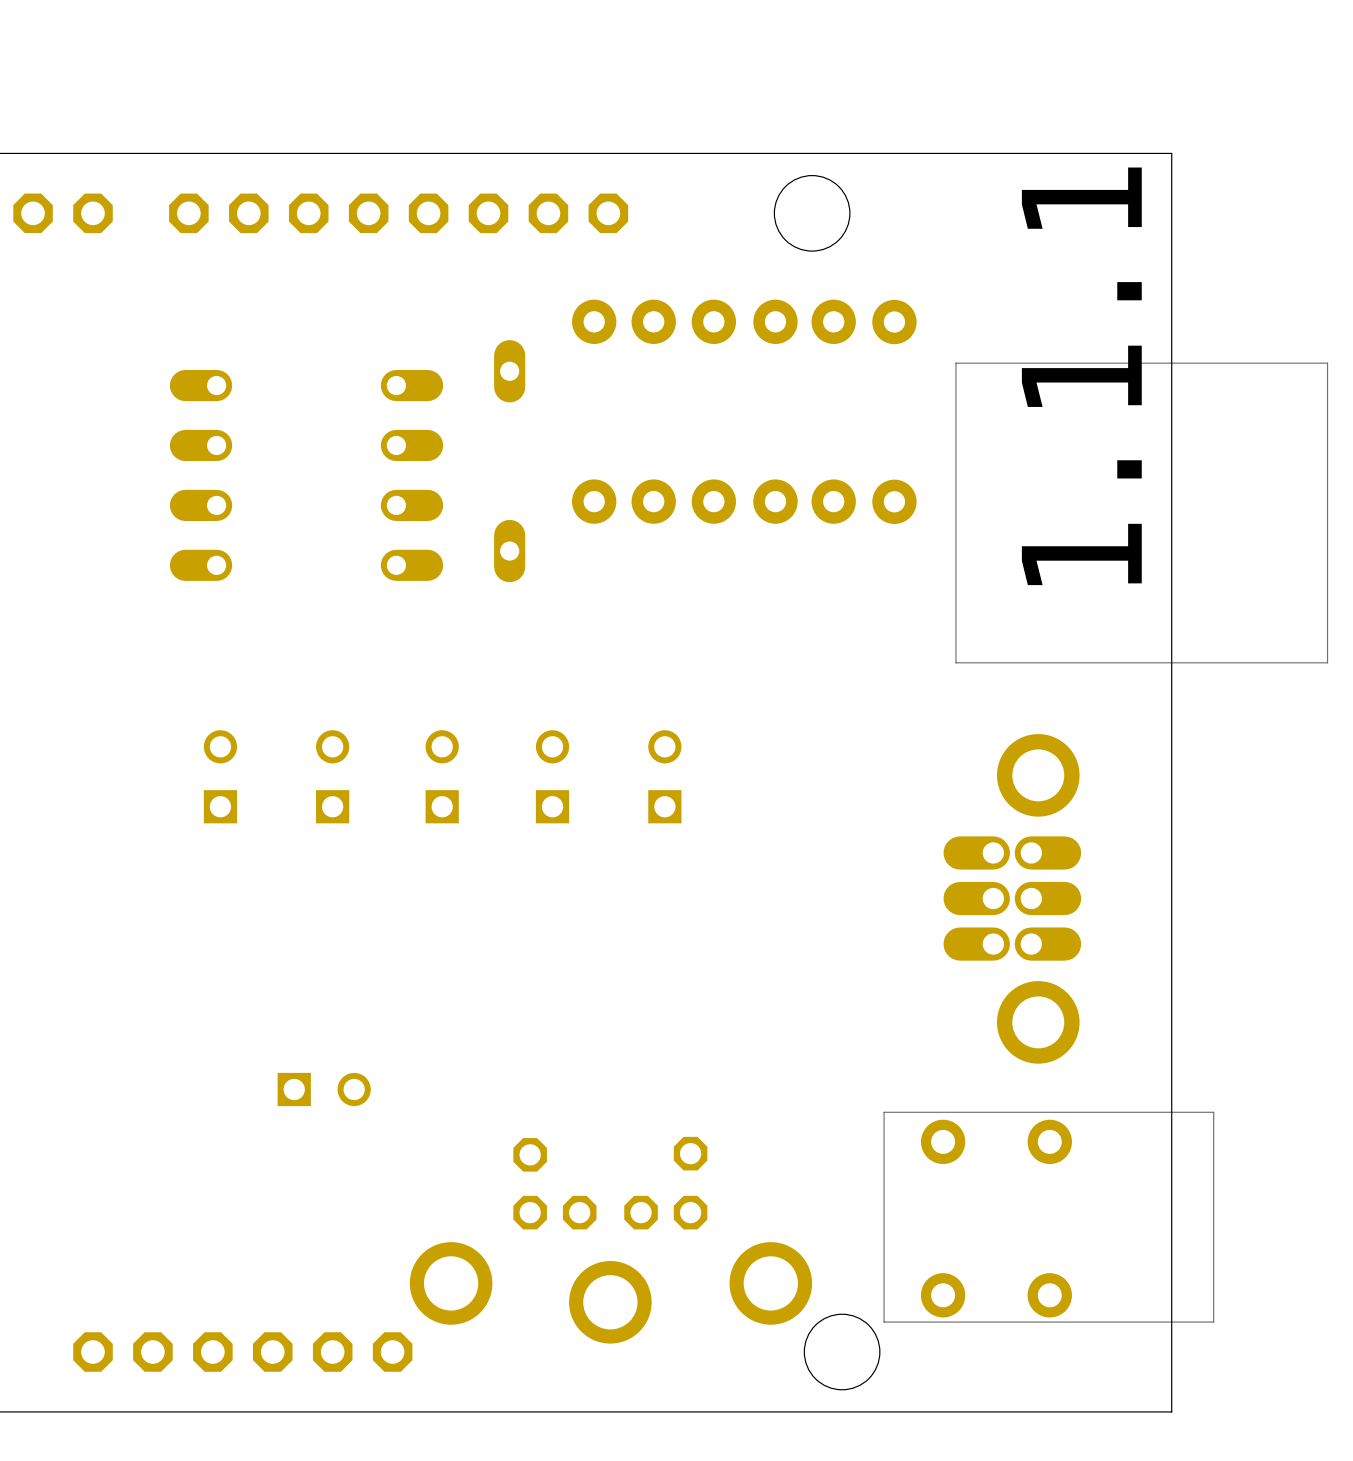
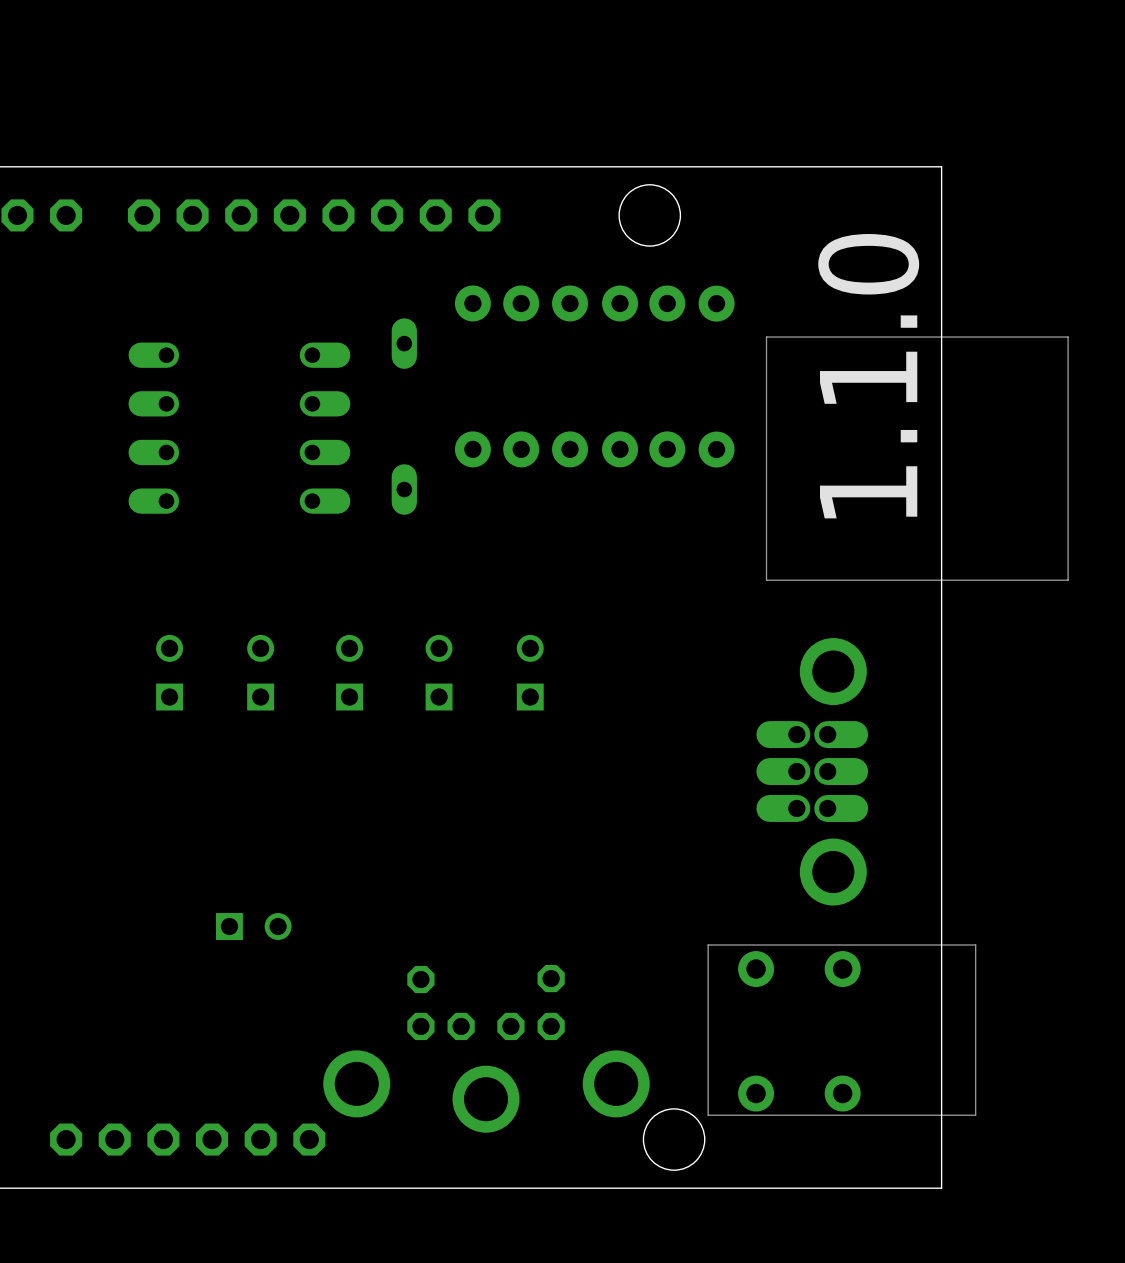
text: 1.1.1 (1081, 376) -> 1.1.0 (868, 376)

